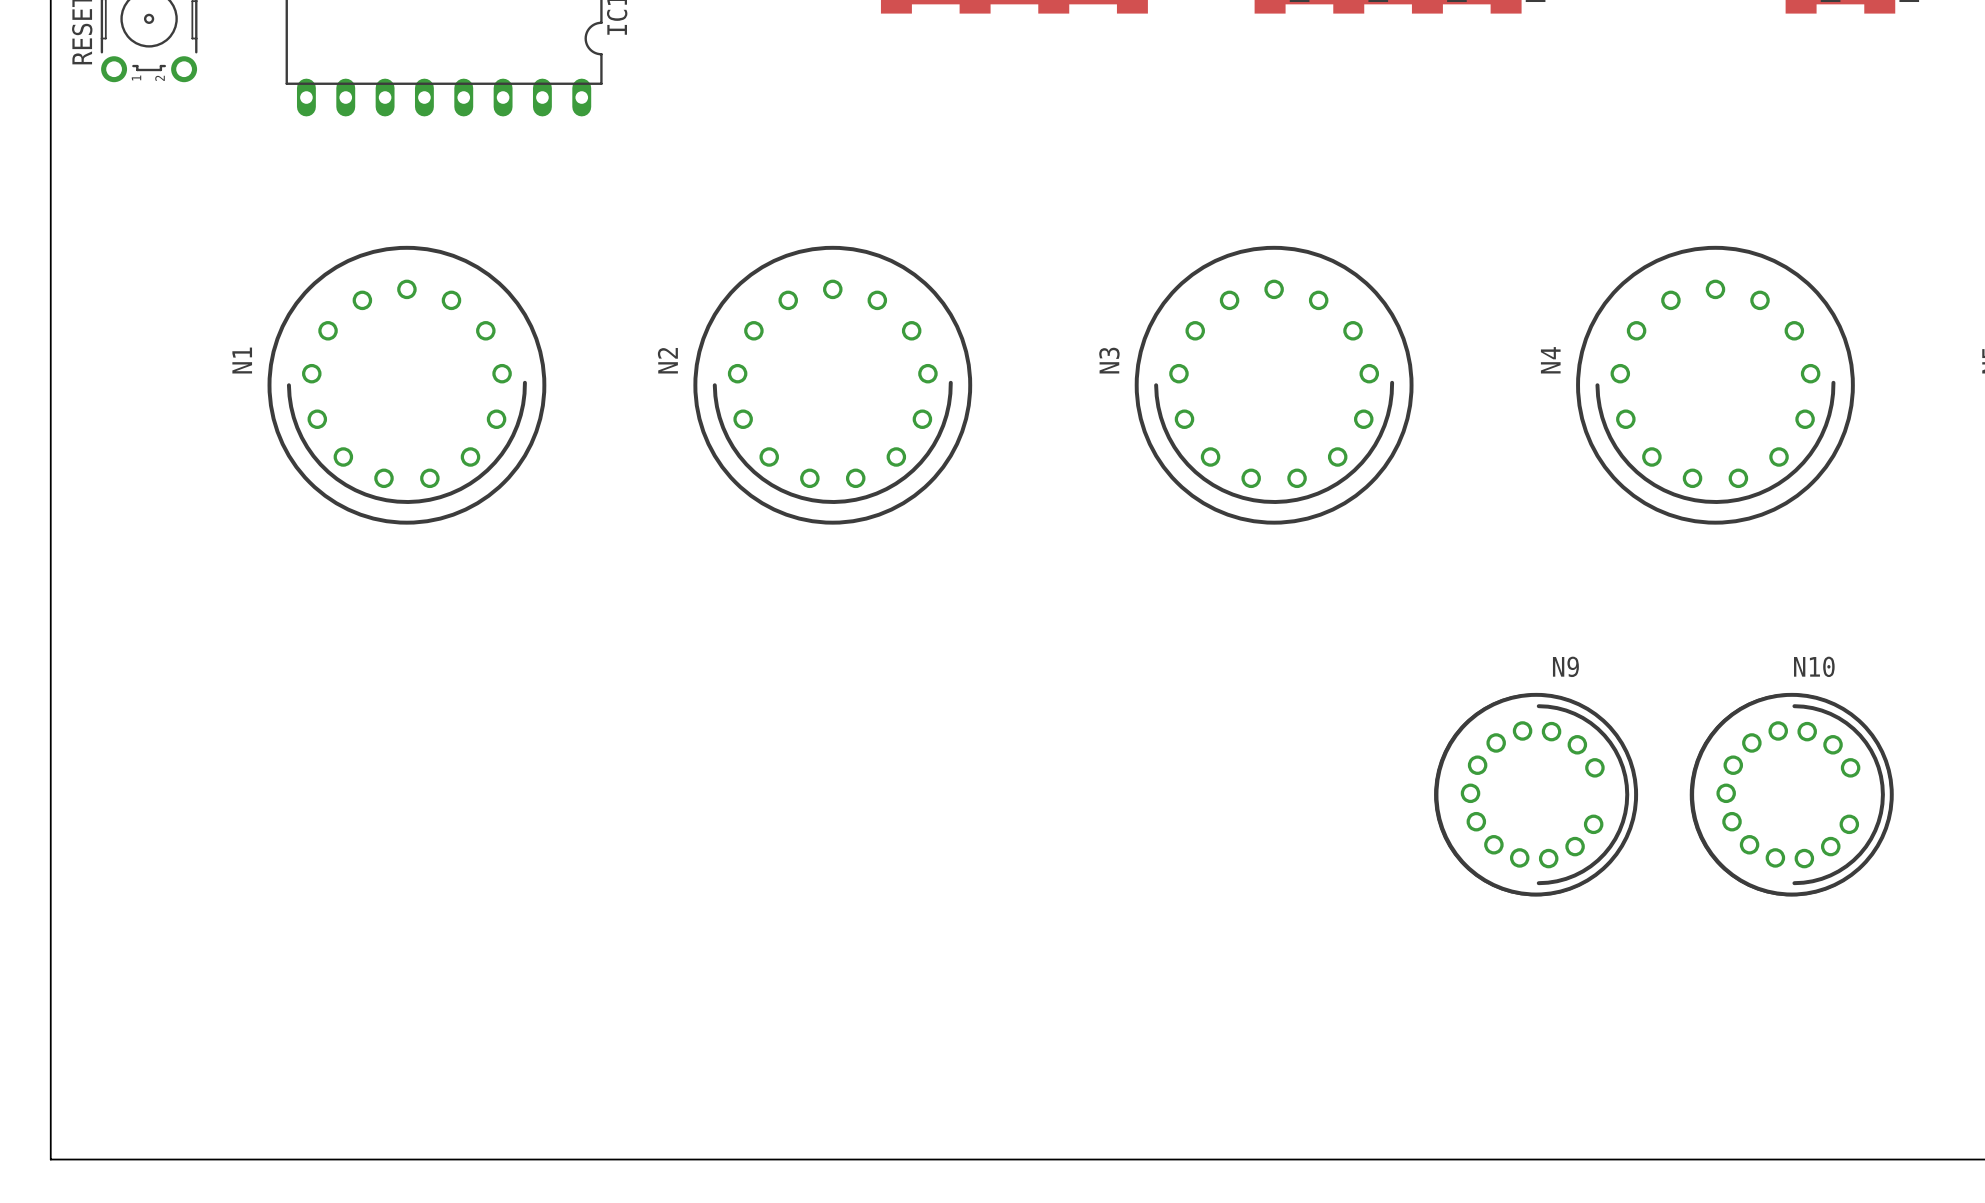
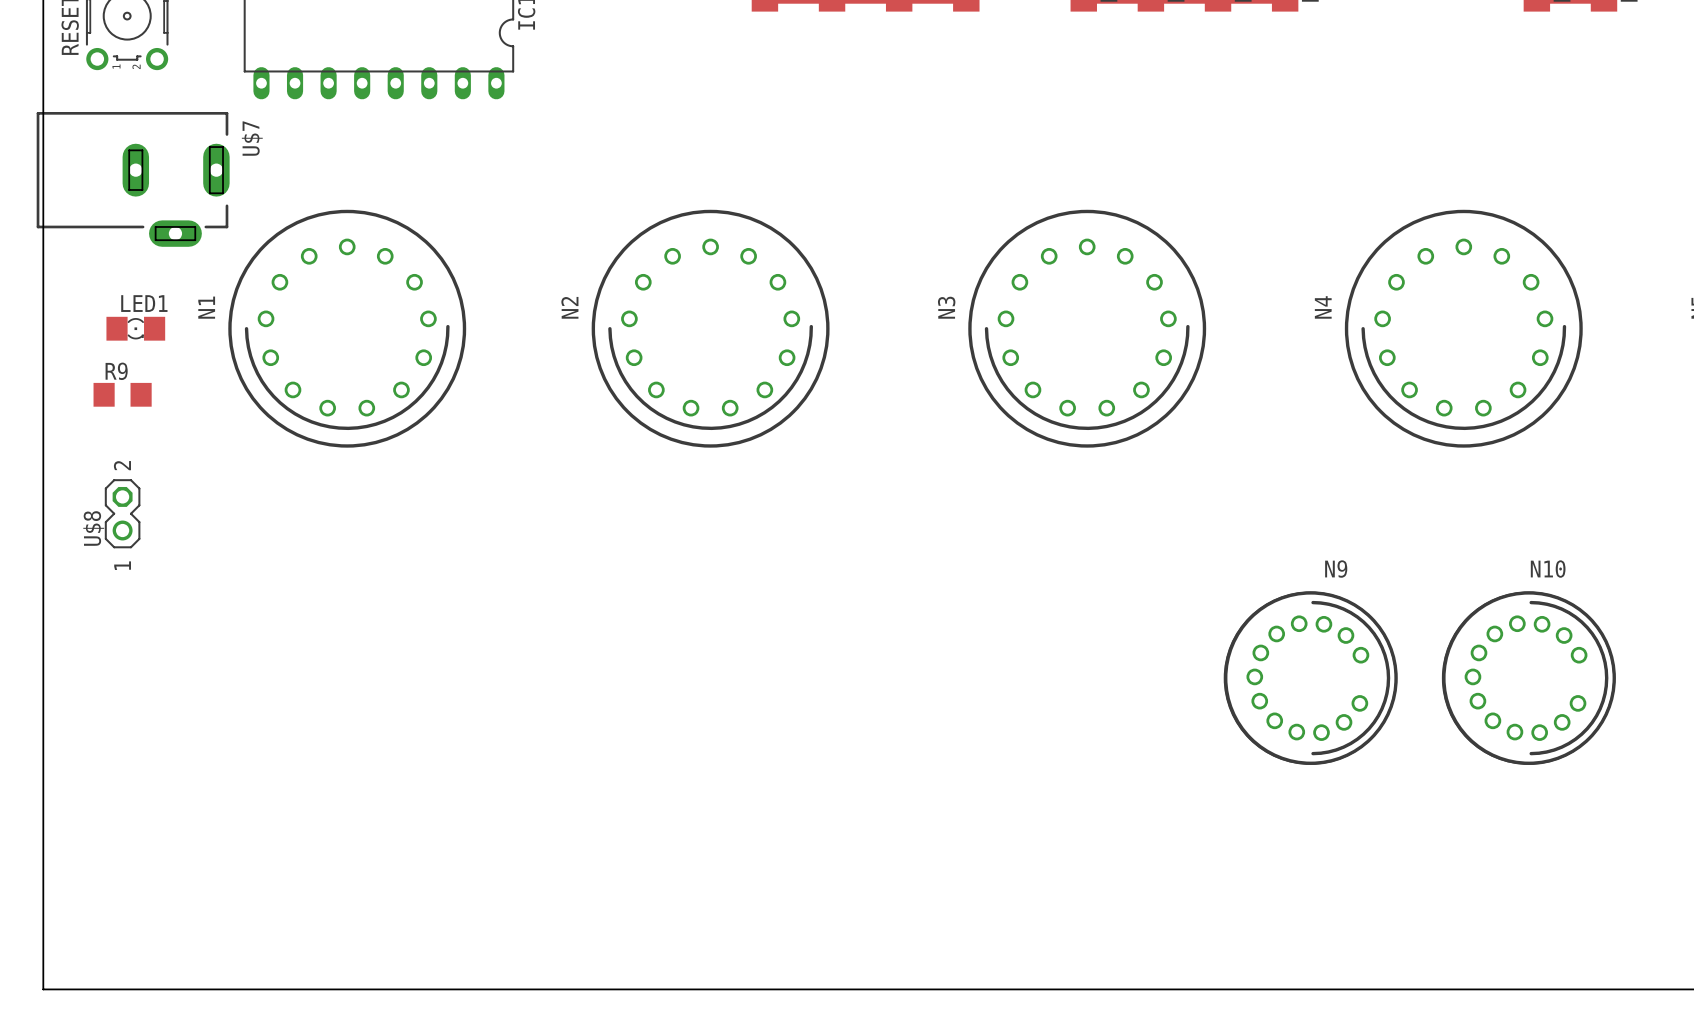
U$7: none -> (133, 179)
LED1: none -> (135, 328)
R9: none -> (122, 394)
U$8: none -> (122, 513)

